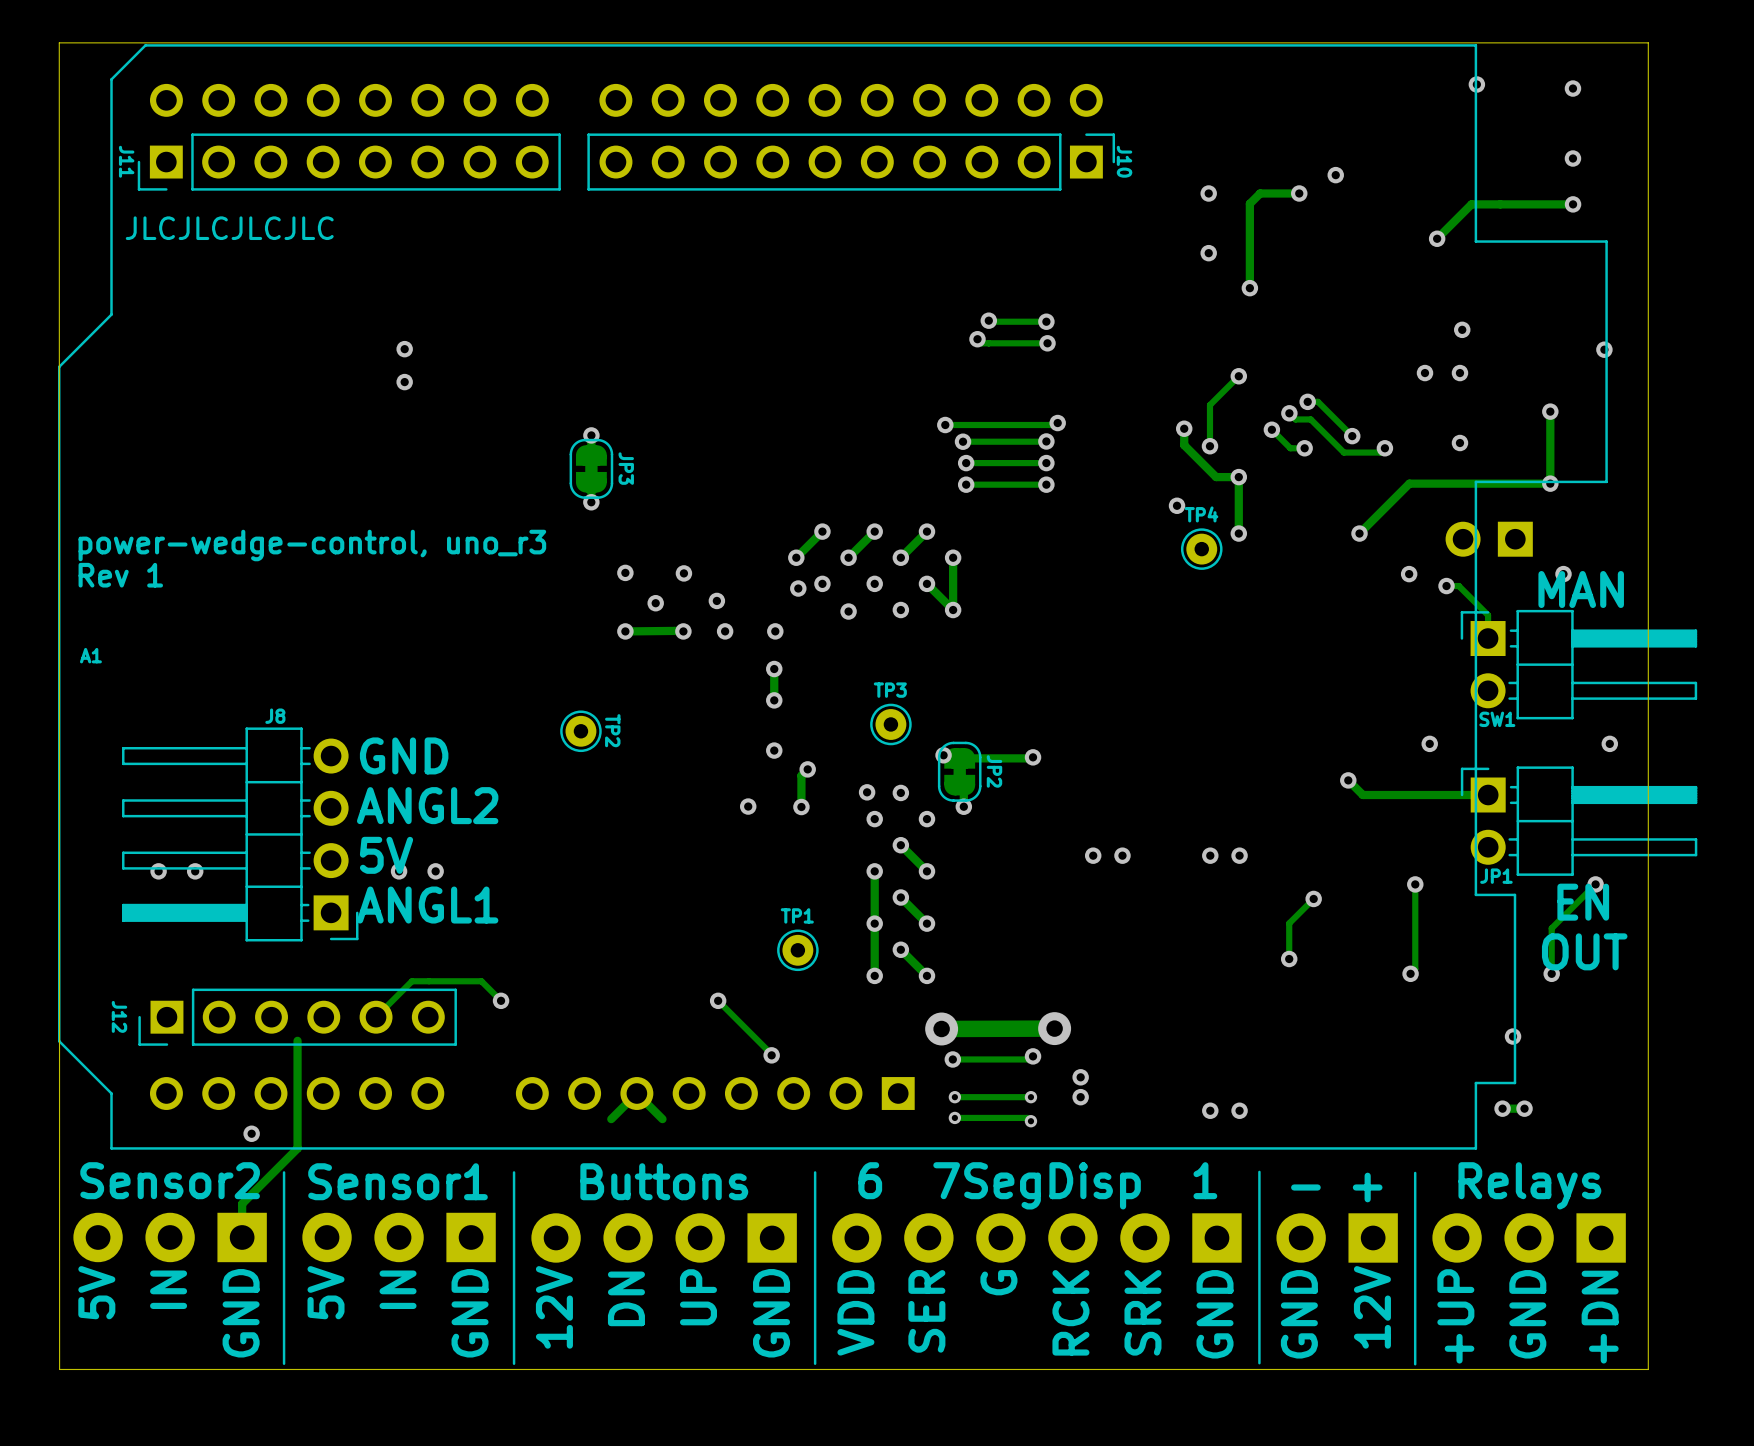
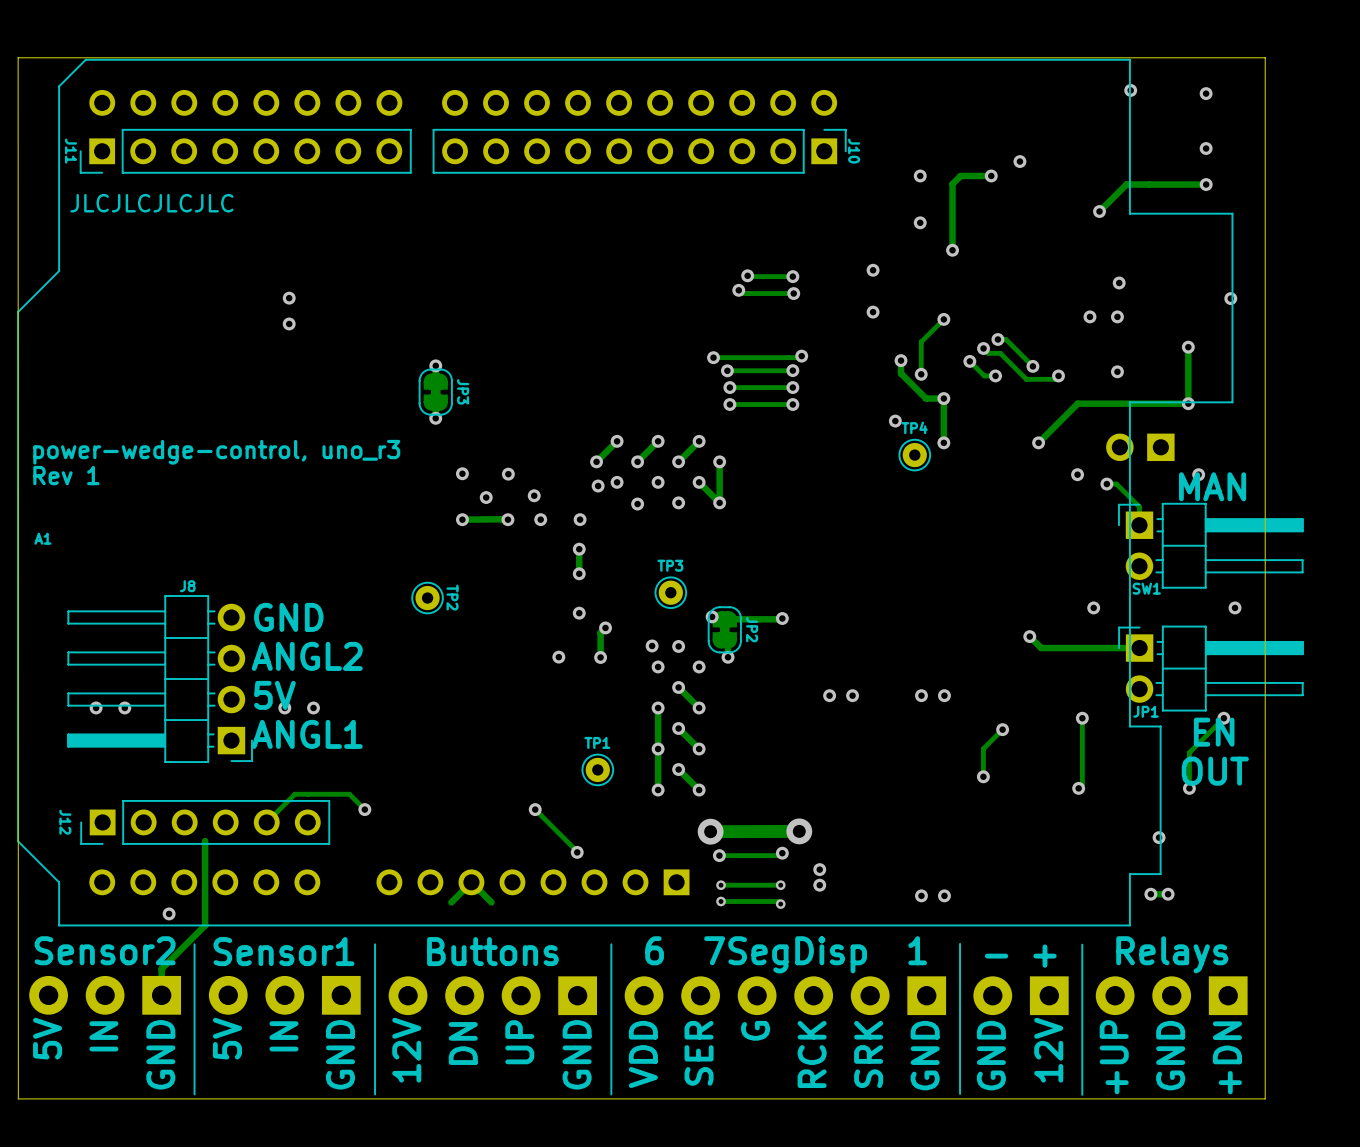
via: none -> (873, 270)
via: none -> (873, 312)

